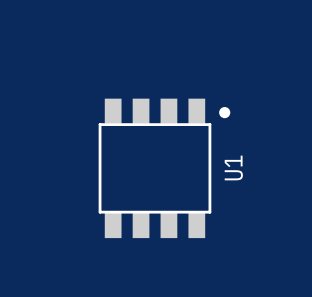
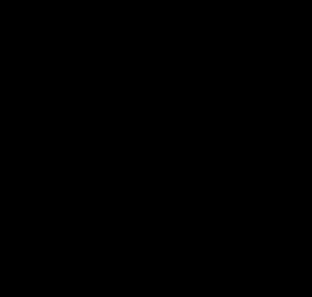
U1: (164, 168) -> none

